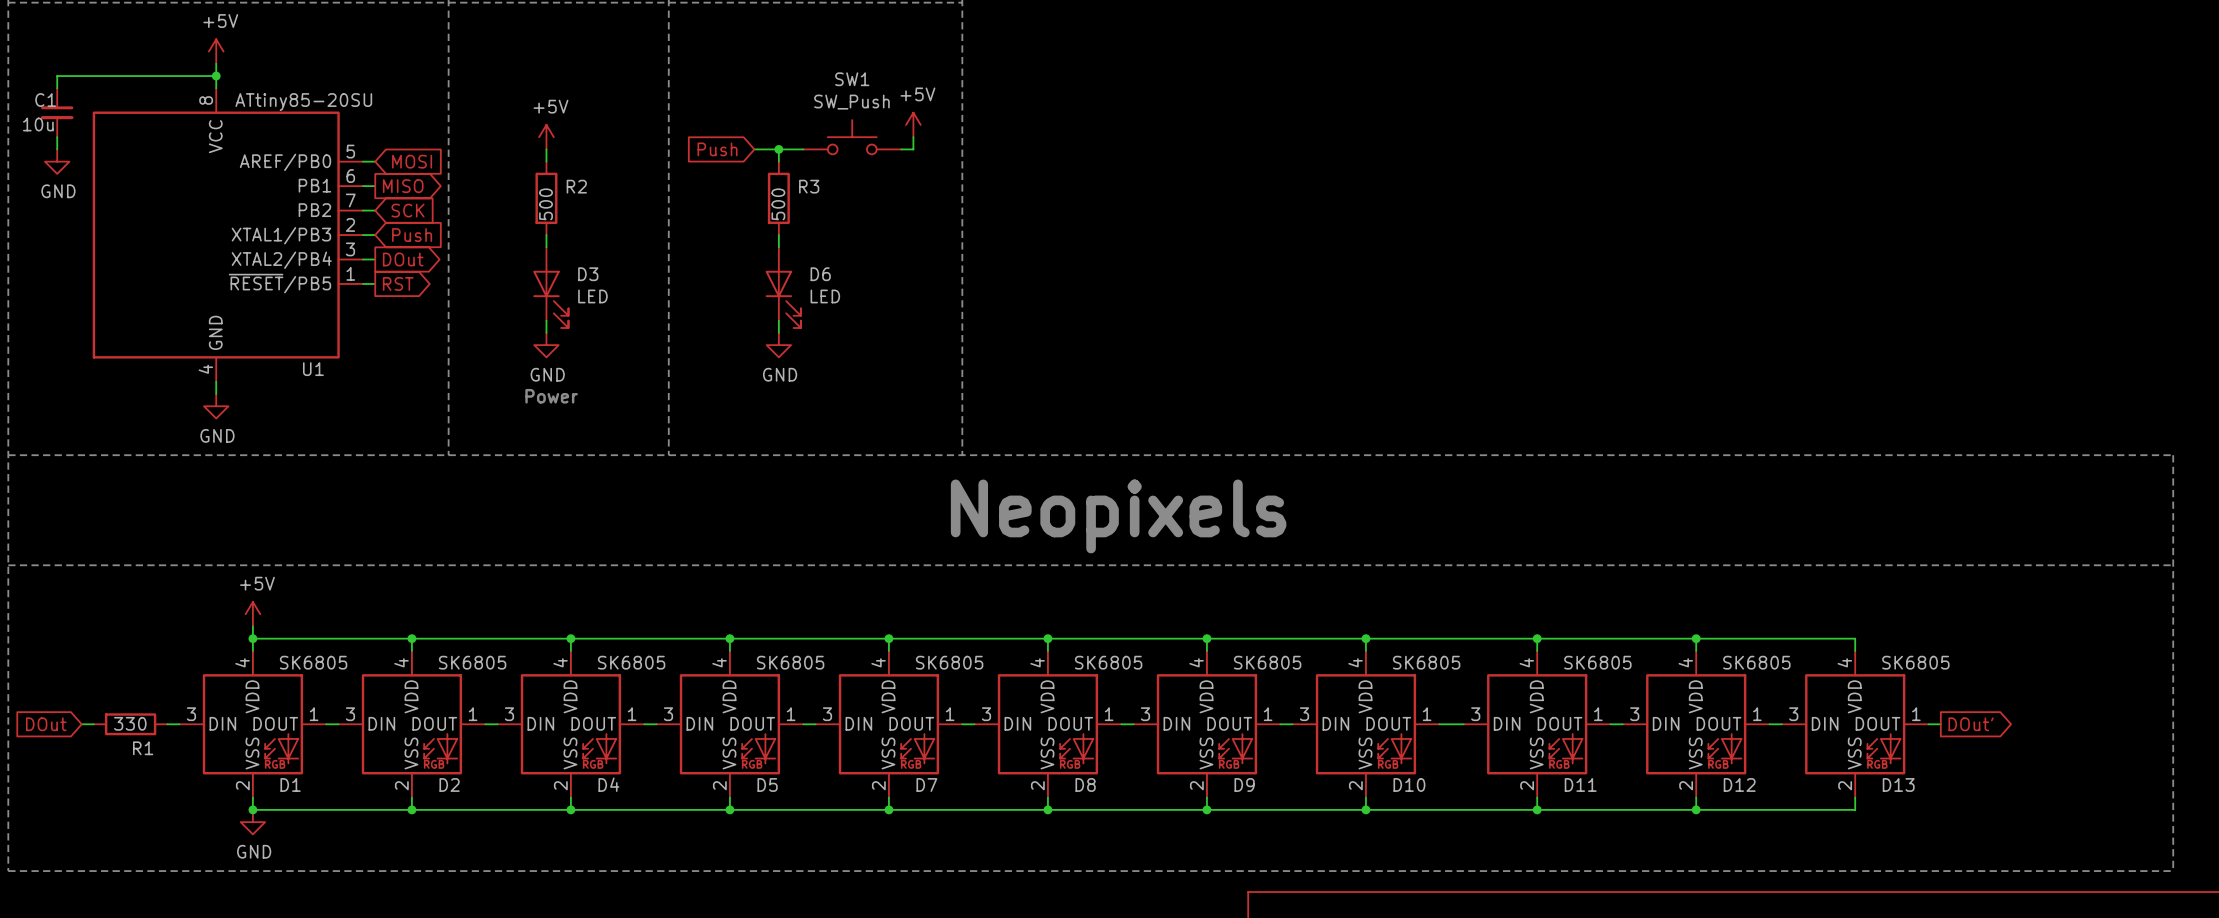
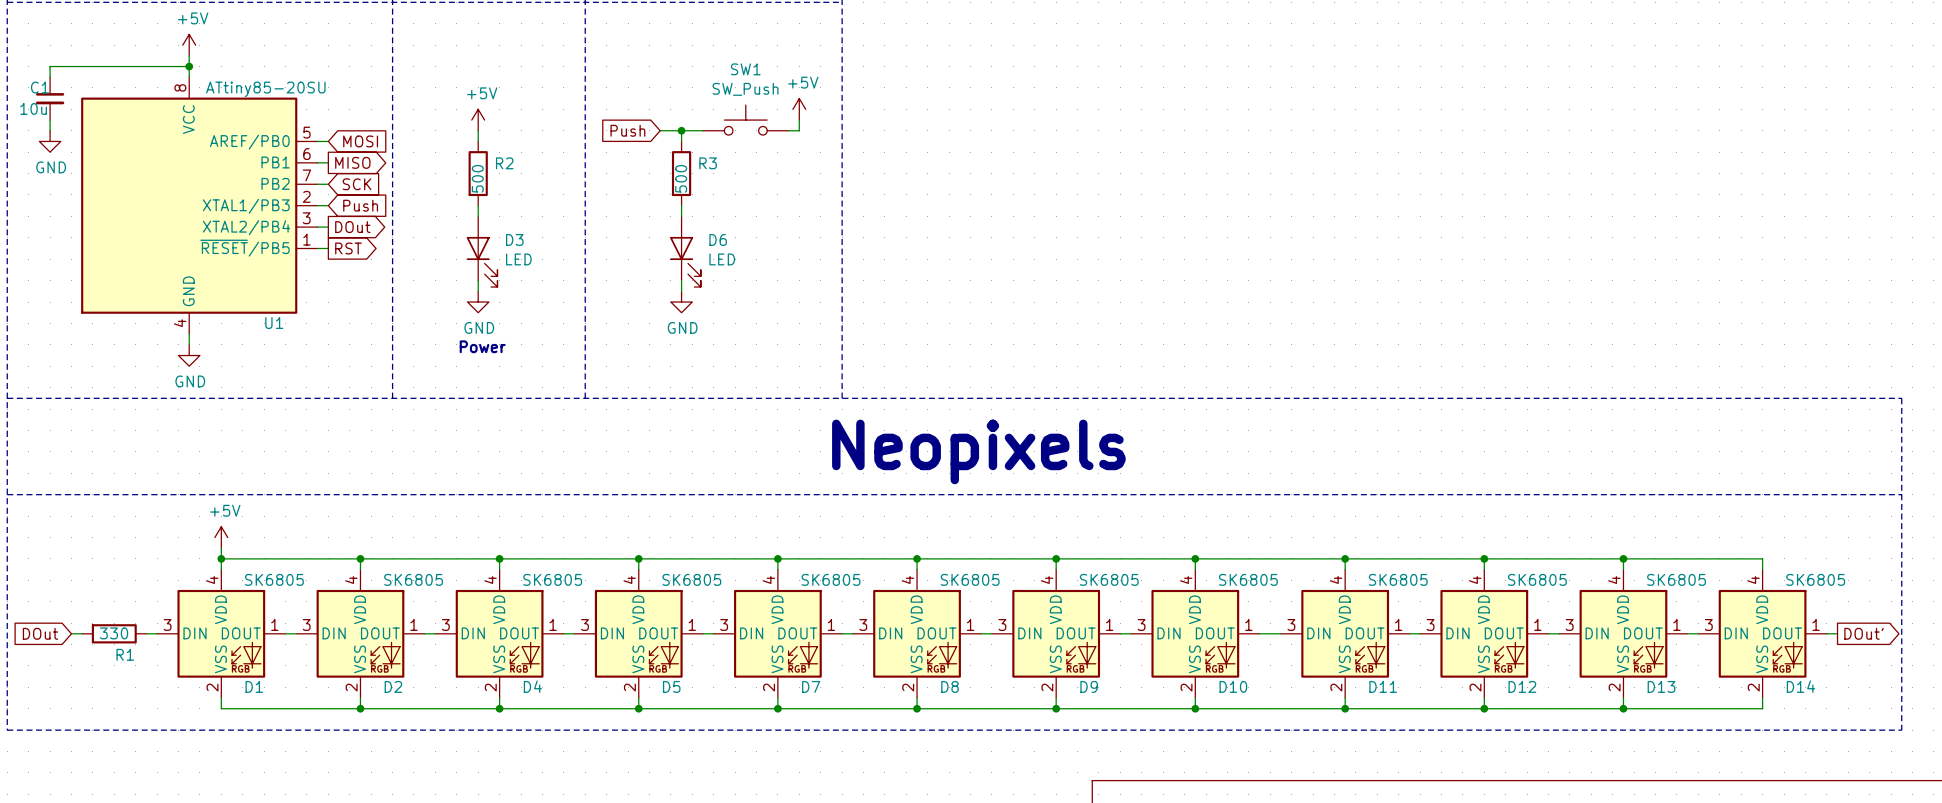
wire: none -> (1623, 558) (1762, 558) (1762, 569)
junction: none -> (1623, 558)
global label position: DOut' (1971, 724) -> DOut' (1864, 633)
D14: none -> SK6805 (1762, 633)
wire: none -> (1826, 633) (1837, 633)
wire: none -> (1762, 698) (1762, 708) (1623, 708)
junction: (252, 809) -> none
junction: none -> (1623, 708)
power symbol: GND (252, 822) -> none
line: (8, 834) (8, 871) (2173, 871) (2173, 834) -> (7, 730) (1901, 730)

